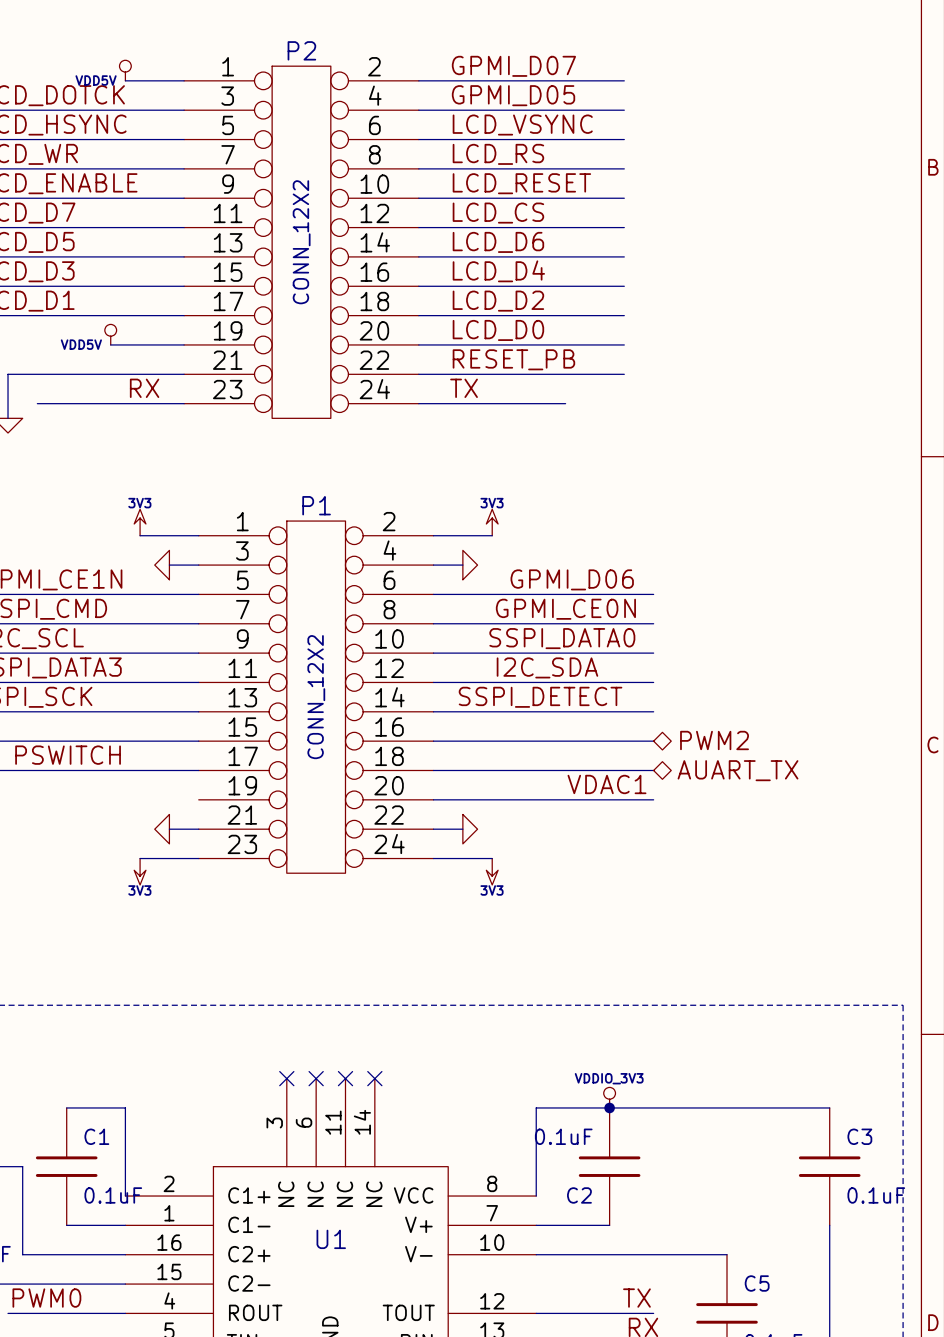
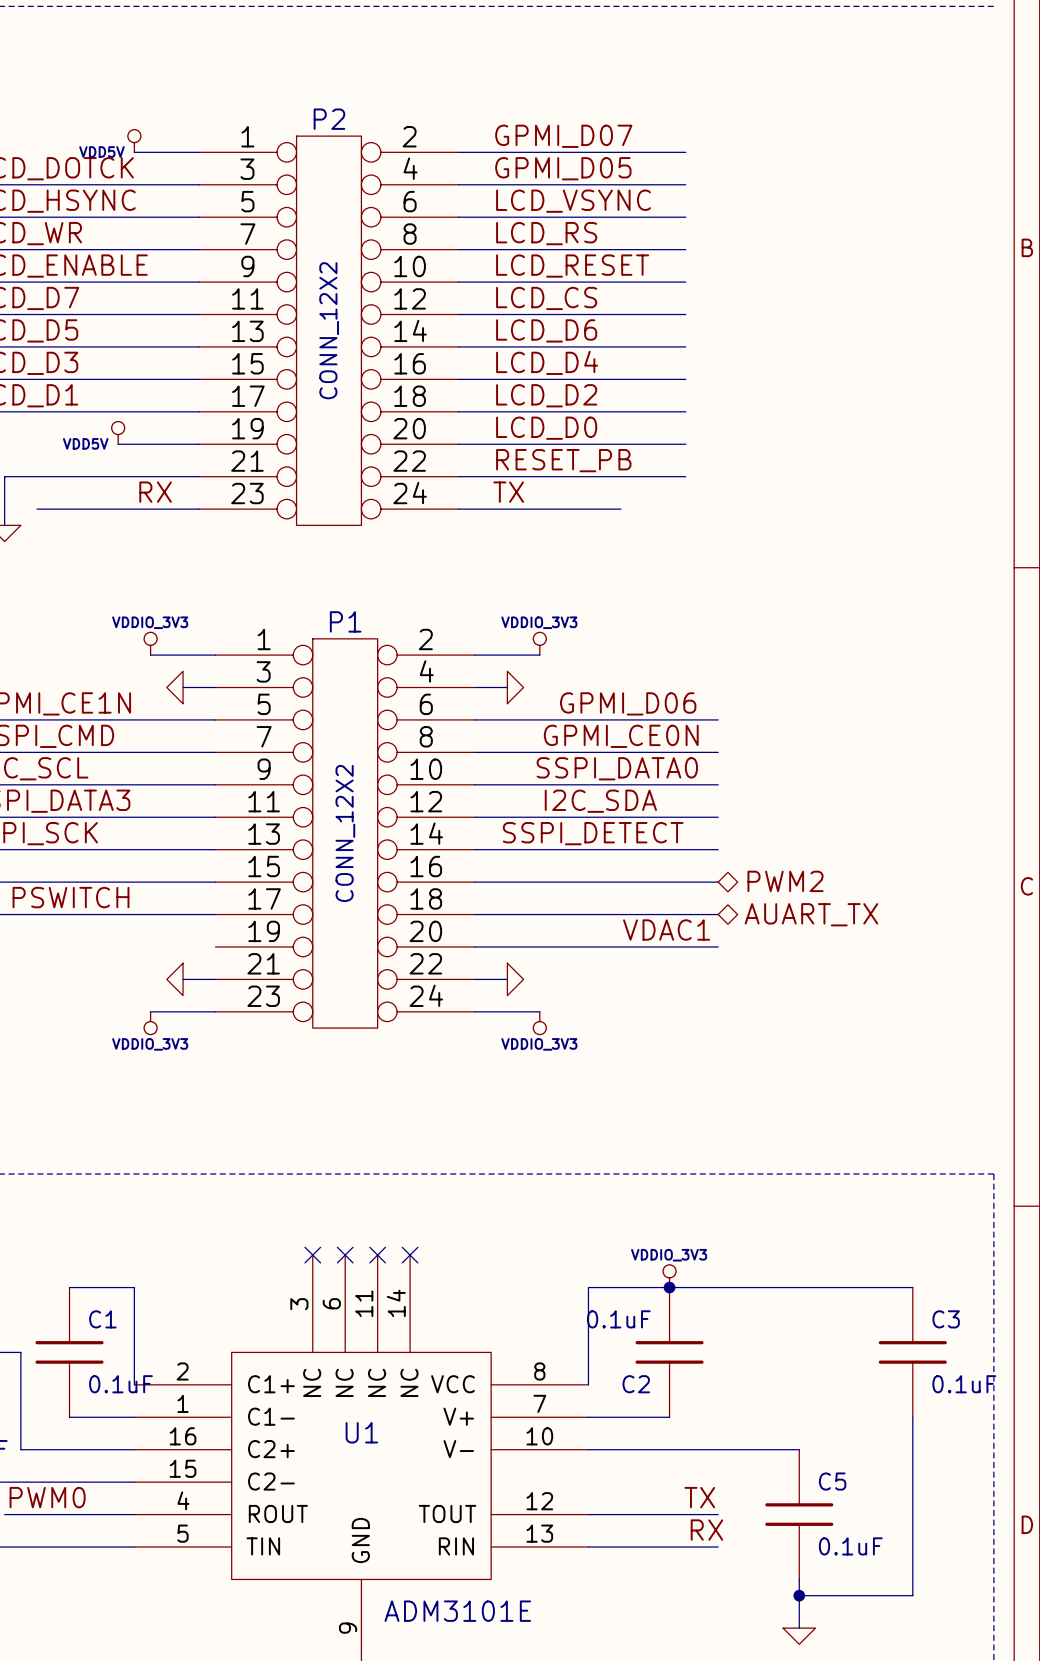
power symbol: 3V3 (140, 522) -> VDDIO_3V3 (150, 643)
power symbol: 3V3 (492, 522) -> VDDIO_3V3 (539, 643)
power symbol: 3V3 (140, 871) -> VDDIO_3V3 (150, 1023)
power symbol: 3V3 (492, 871) -> VDDIO_3V3 (539, 1023)

